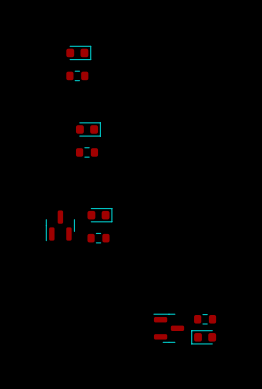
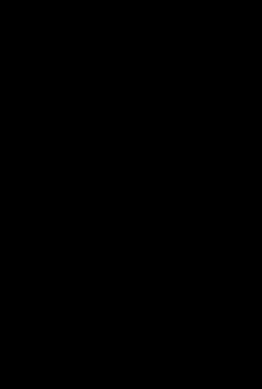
part: (78, 52) -> none
part: (77, 75) -> none
part: (88, 129) -> none
part: (87, 152) -> none
part: (99, 215) -> none
part: (60, 225) -> none
part: (98, 238) -> none
part: (205, 319) -> none
part: (168, 328) -> none
part: (203, 337) -> none

